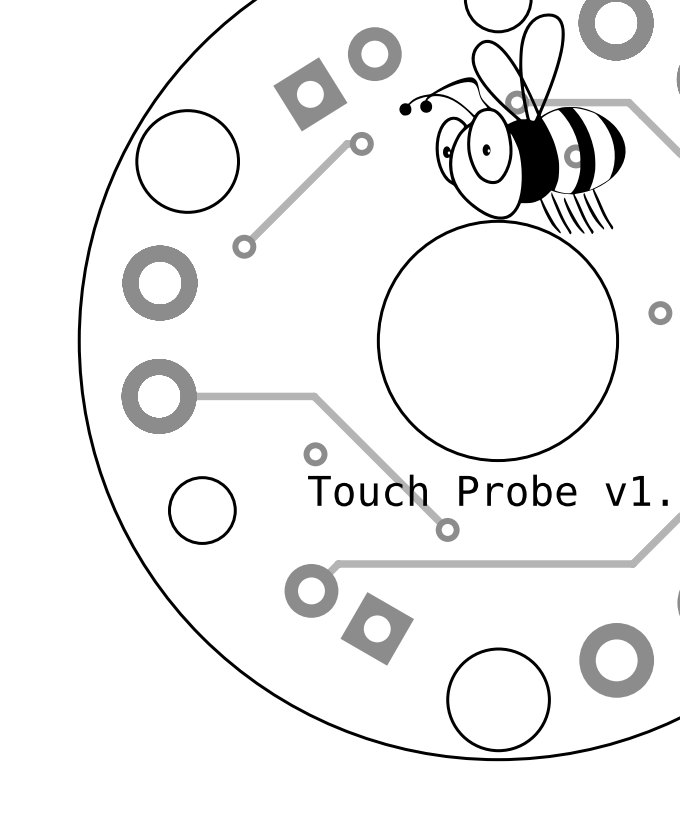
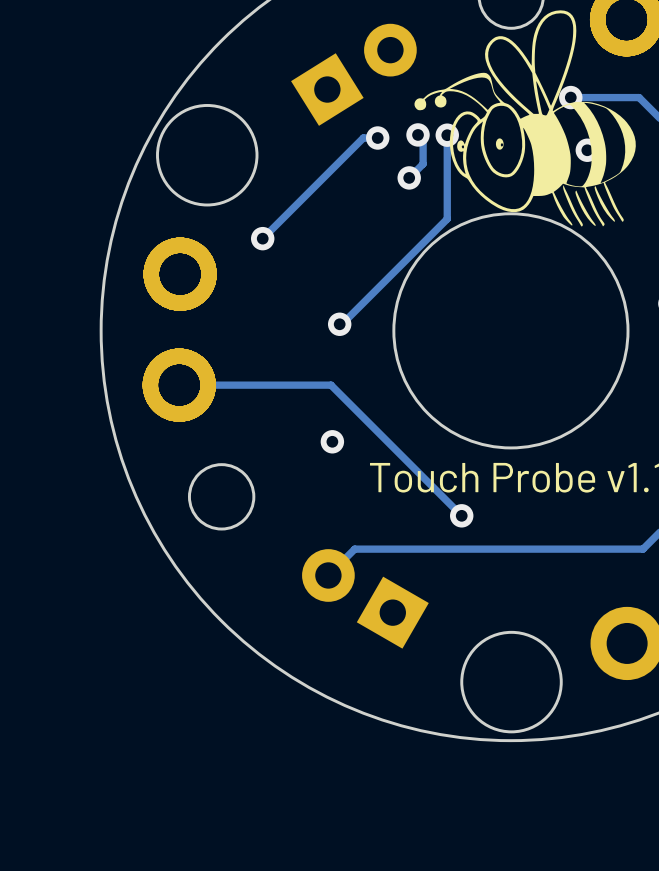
via position: (517, 102) -> (570, 97)
track: (559, 102) (517, 102) -> none
track: none -> (418, 134) (423, 140) (423, 164) (409, 177)
via: none -> (418, 134)
track: none -> (447, 135) (447, 219) (341, 324) (339, 324)
via: none -> (447, 135)
via: none -> (409, 177)
via: none -> (339, 324)

